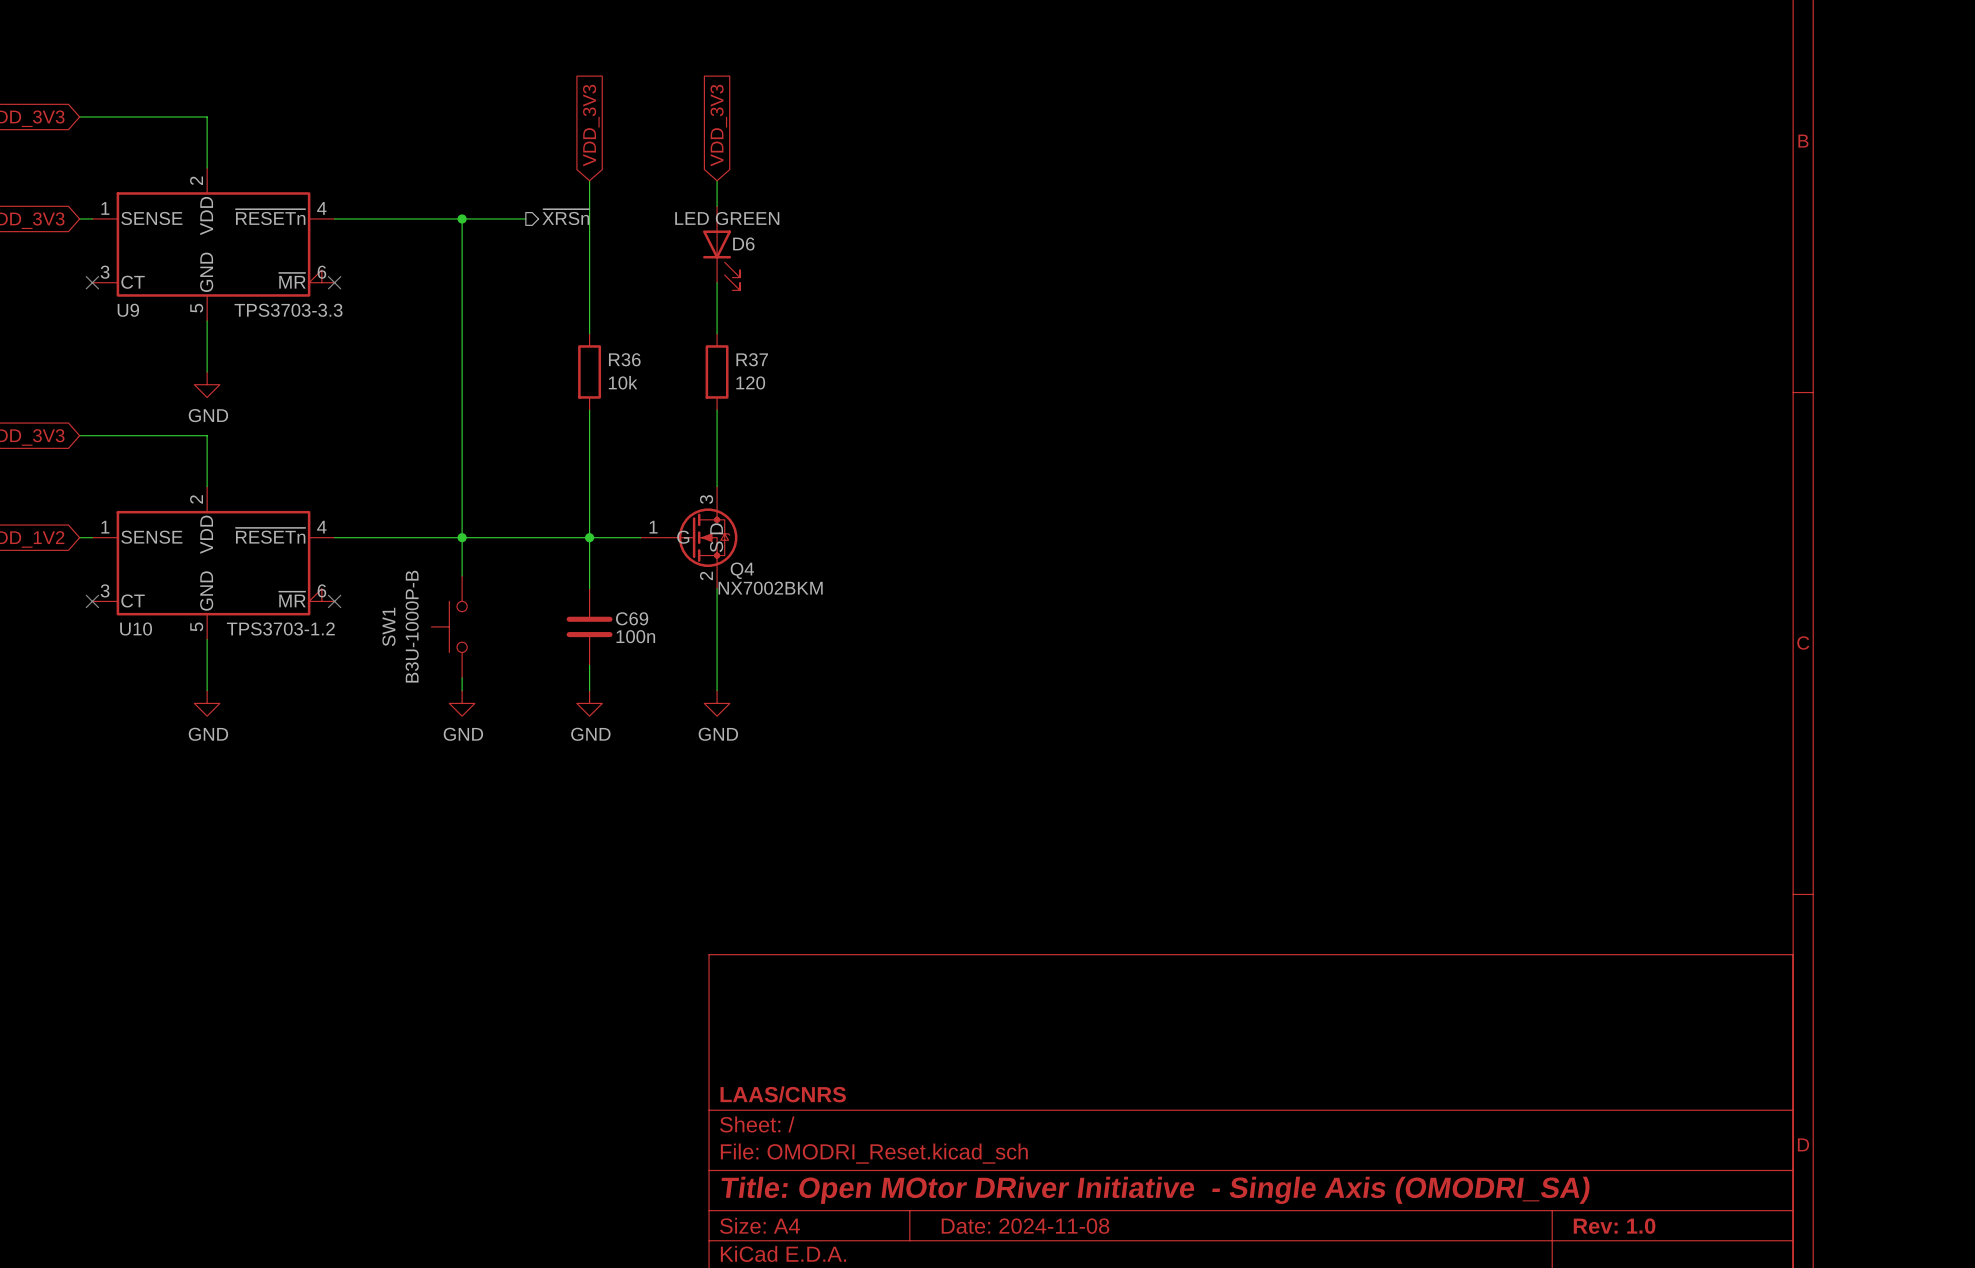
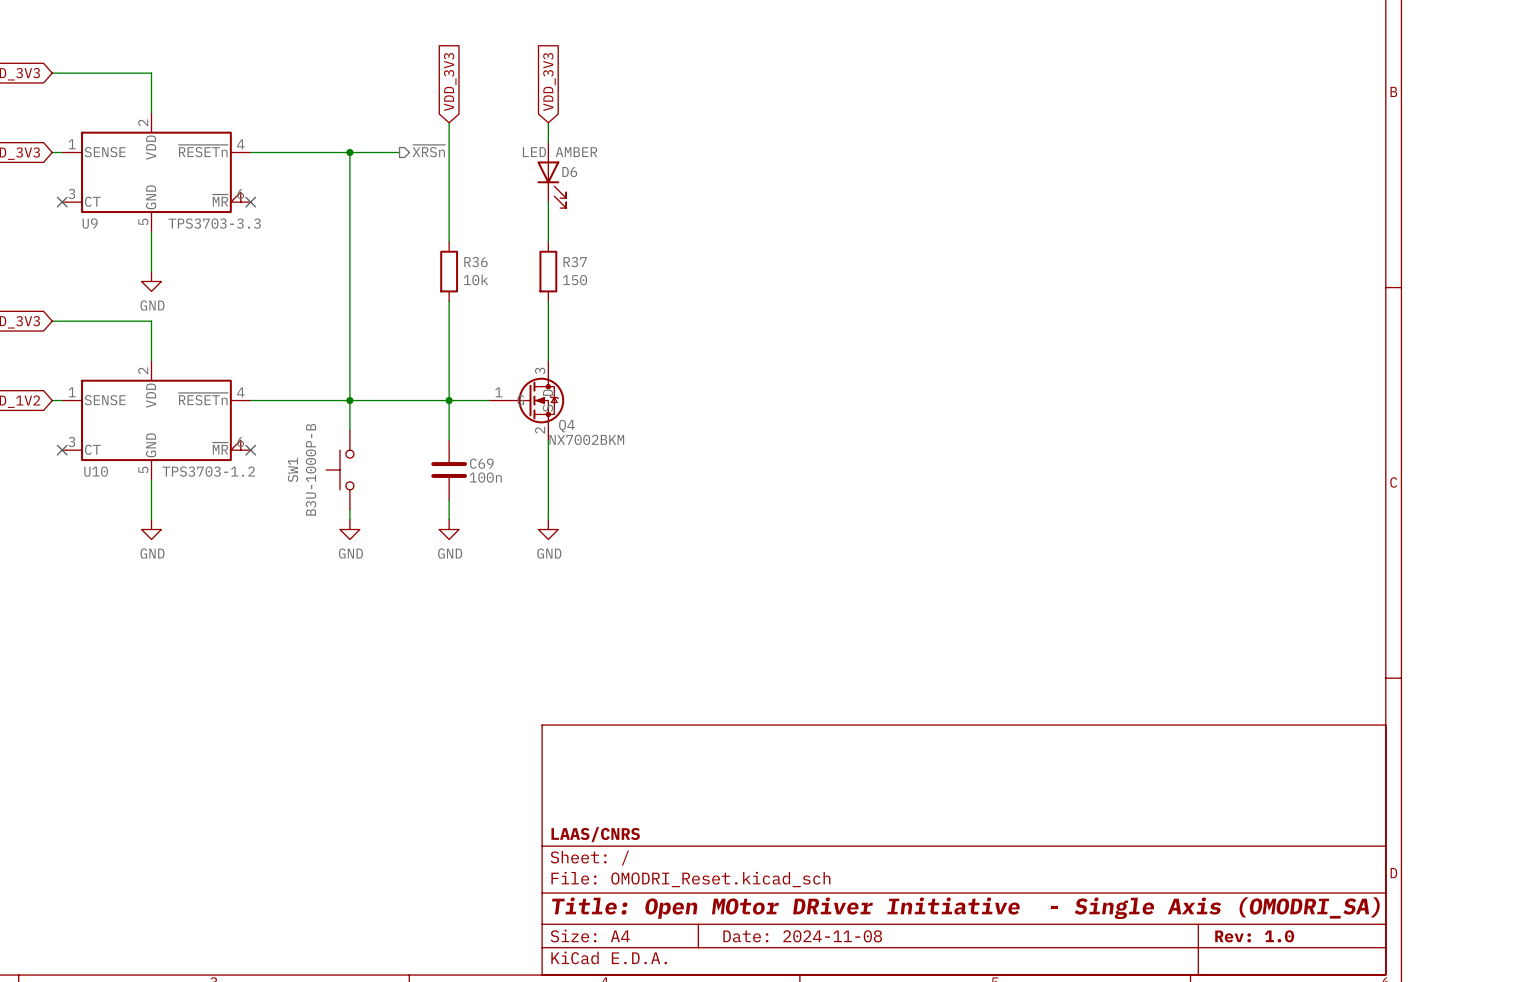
D6 value: LED GREEN (727, 218) -> LED AMBER (560, 152)
R37 value: 120 (750, 382) -> 150 (575, 280)

